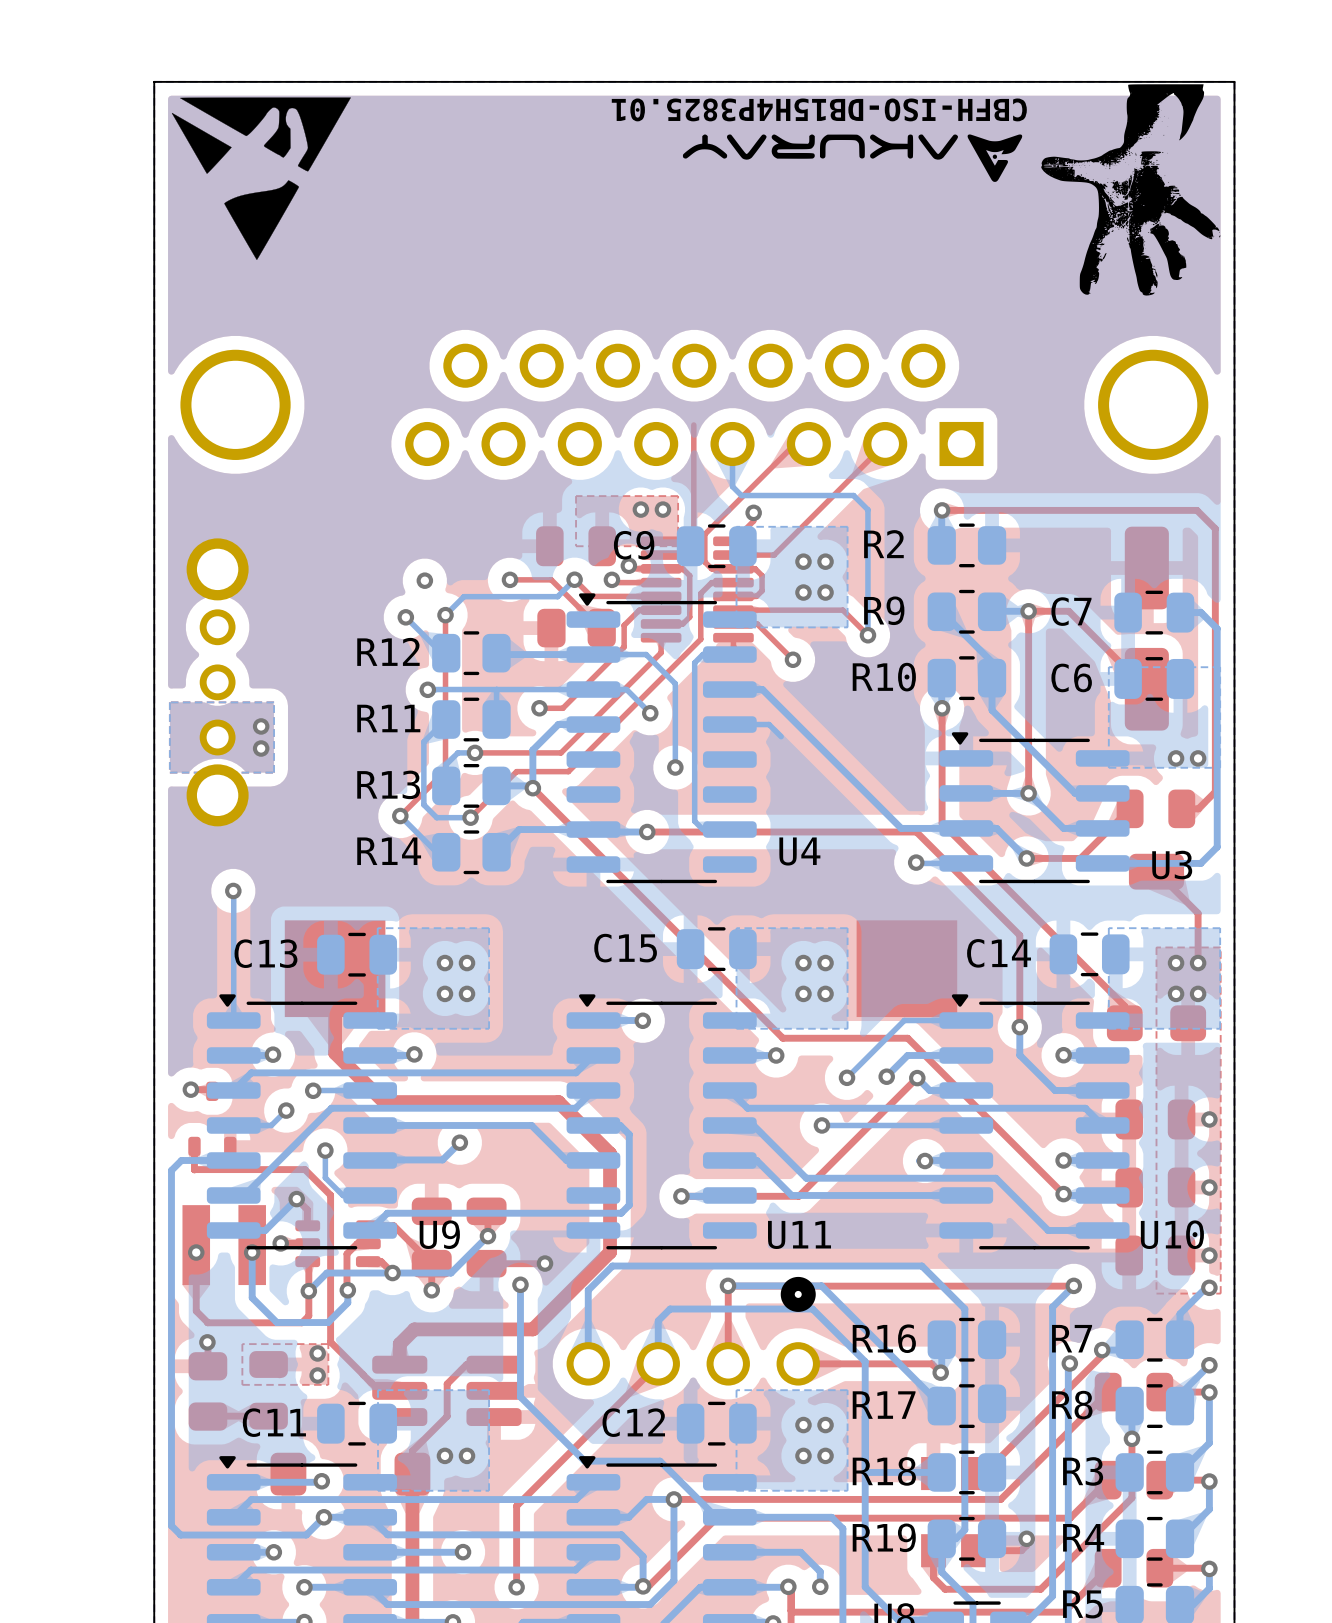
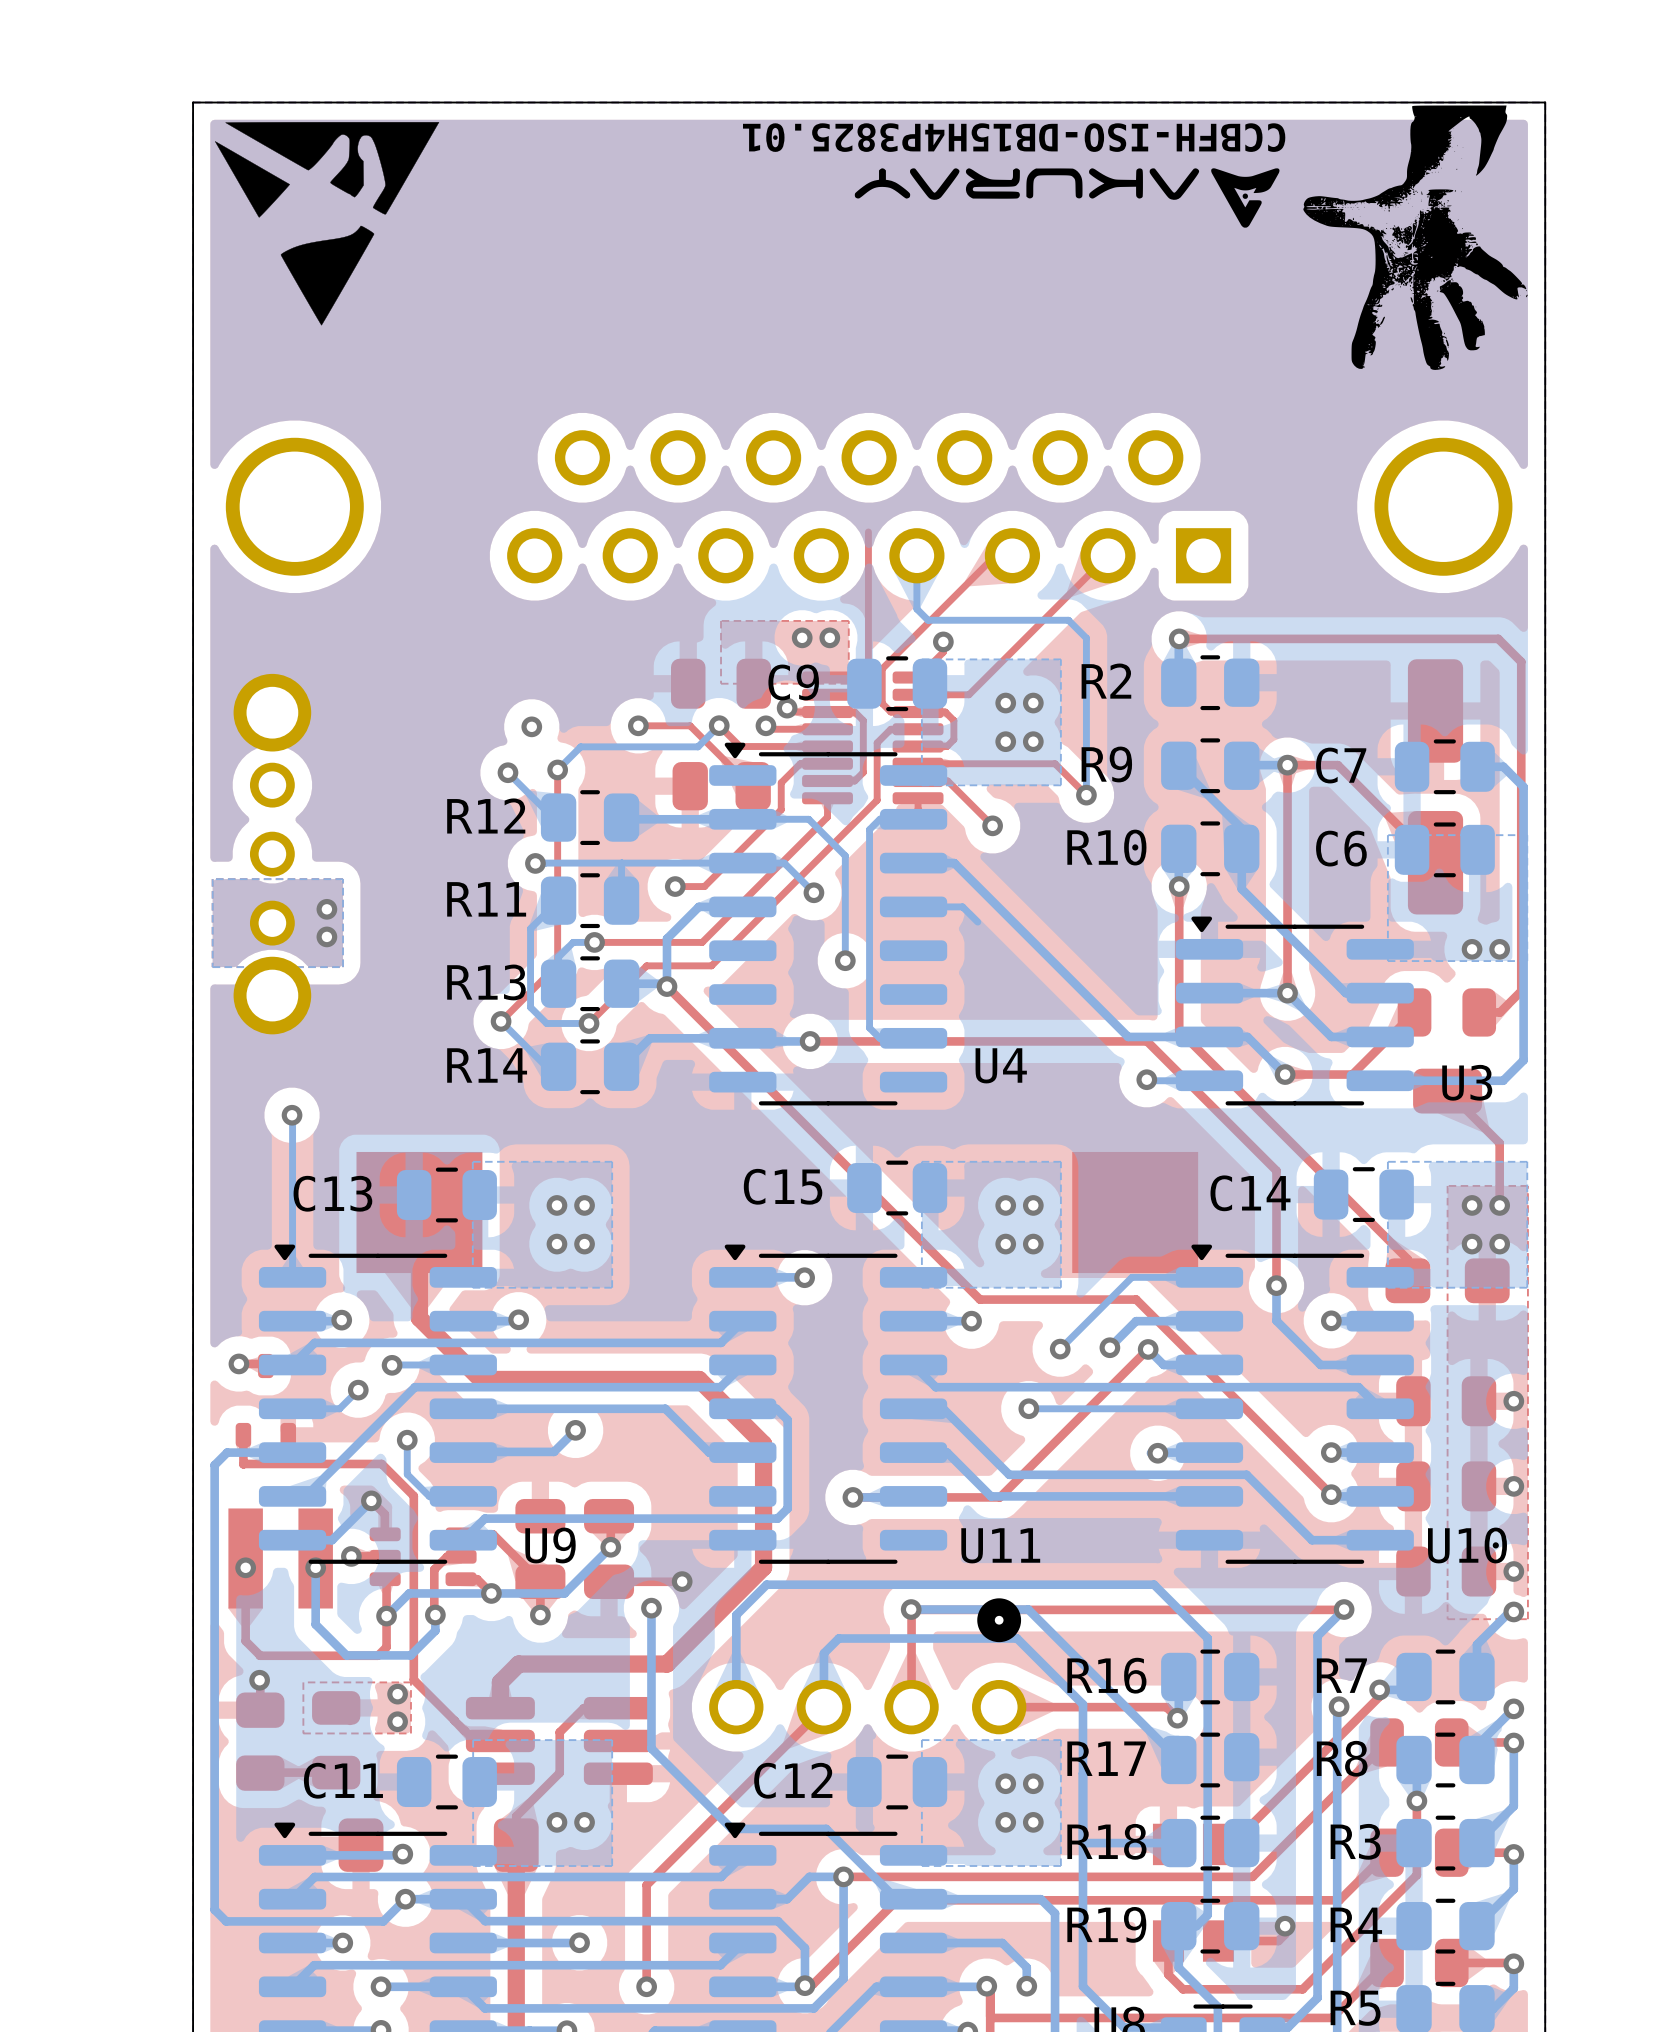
text: CBFH-ISO-DB15H4P3825.01 (819, 109) -> CCBFH-ISO-DB15H4P3825.01 (1014, 137)

